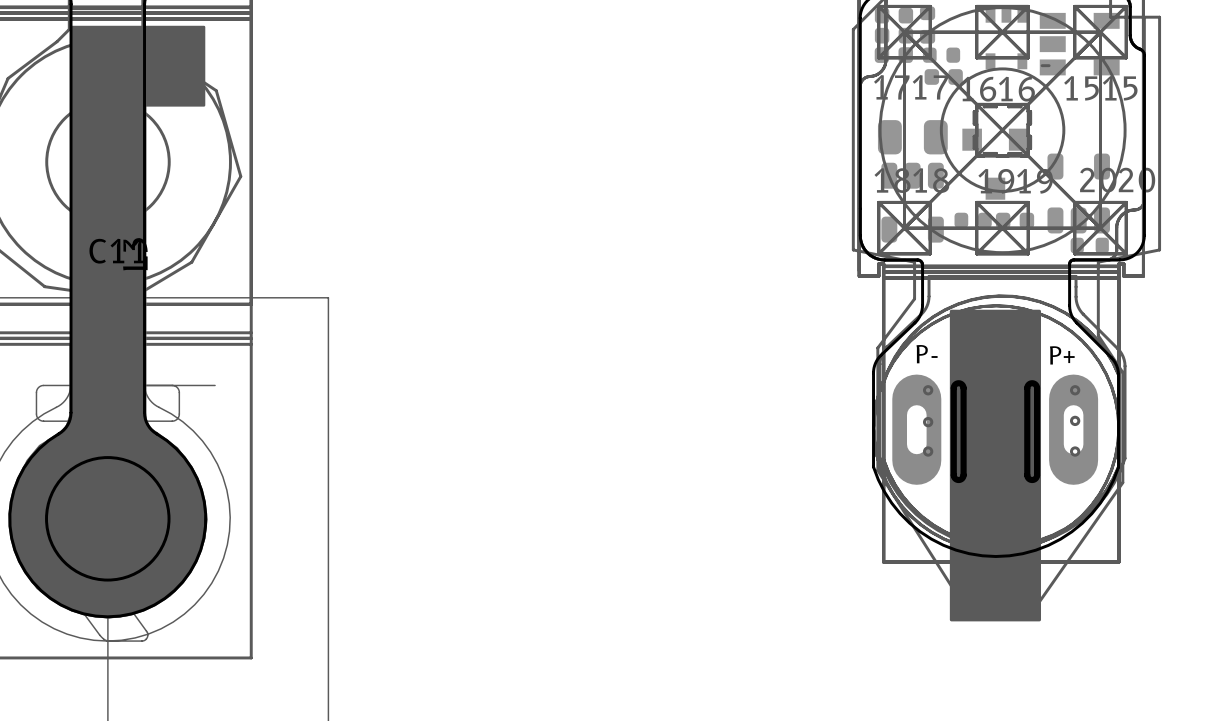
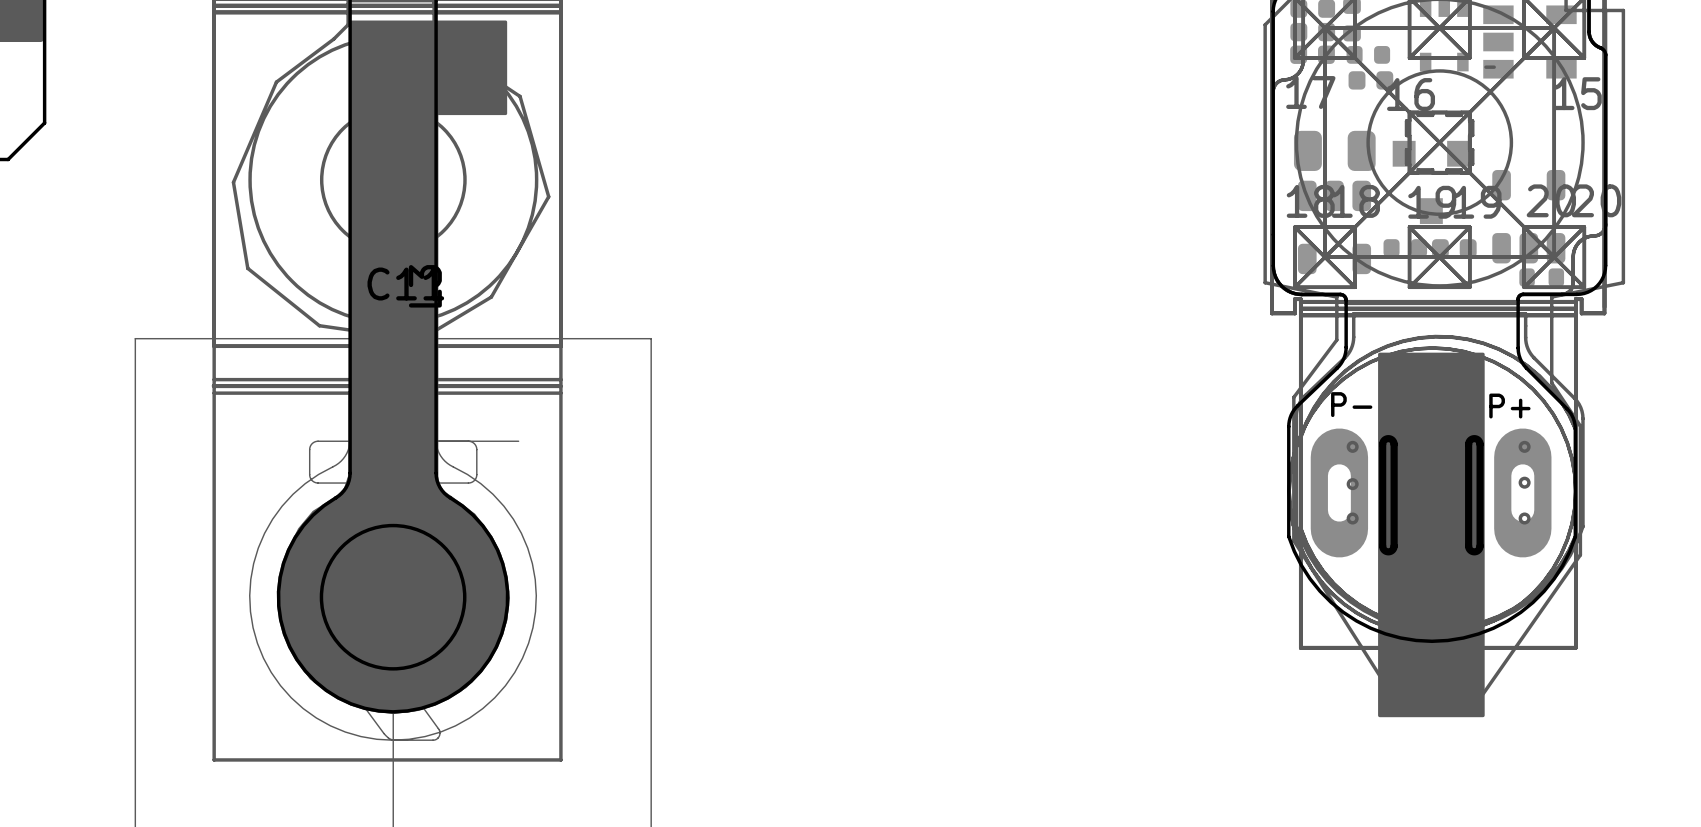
text: 17 (930, 87) -> none
text: 15 (1081, 88) -> none
text: 16 (1016, 89) -> none

